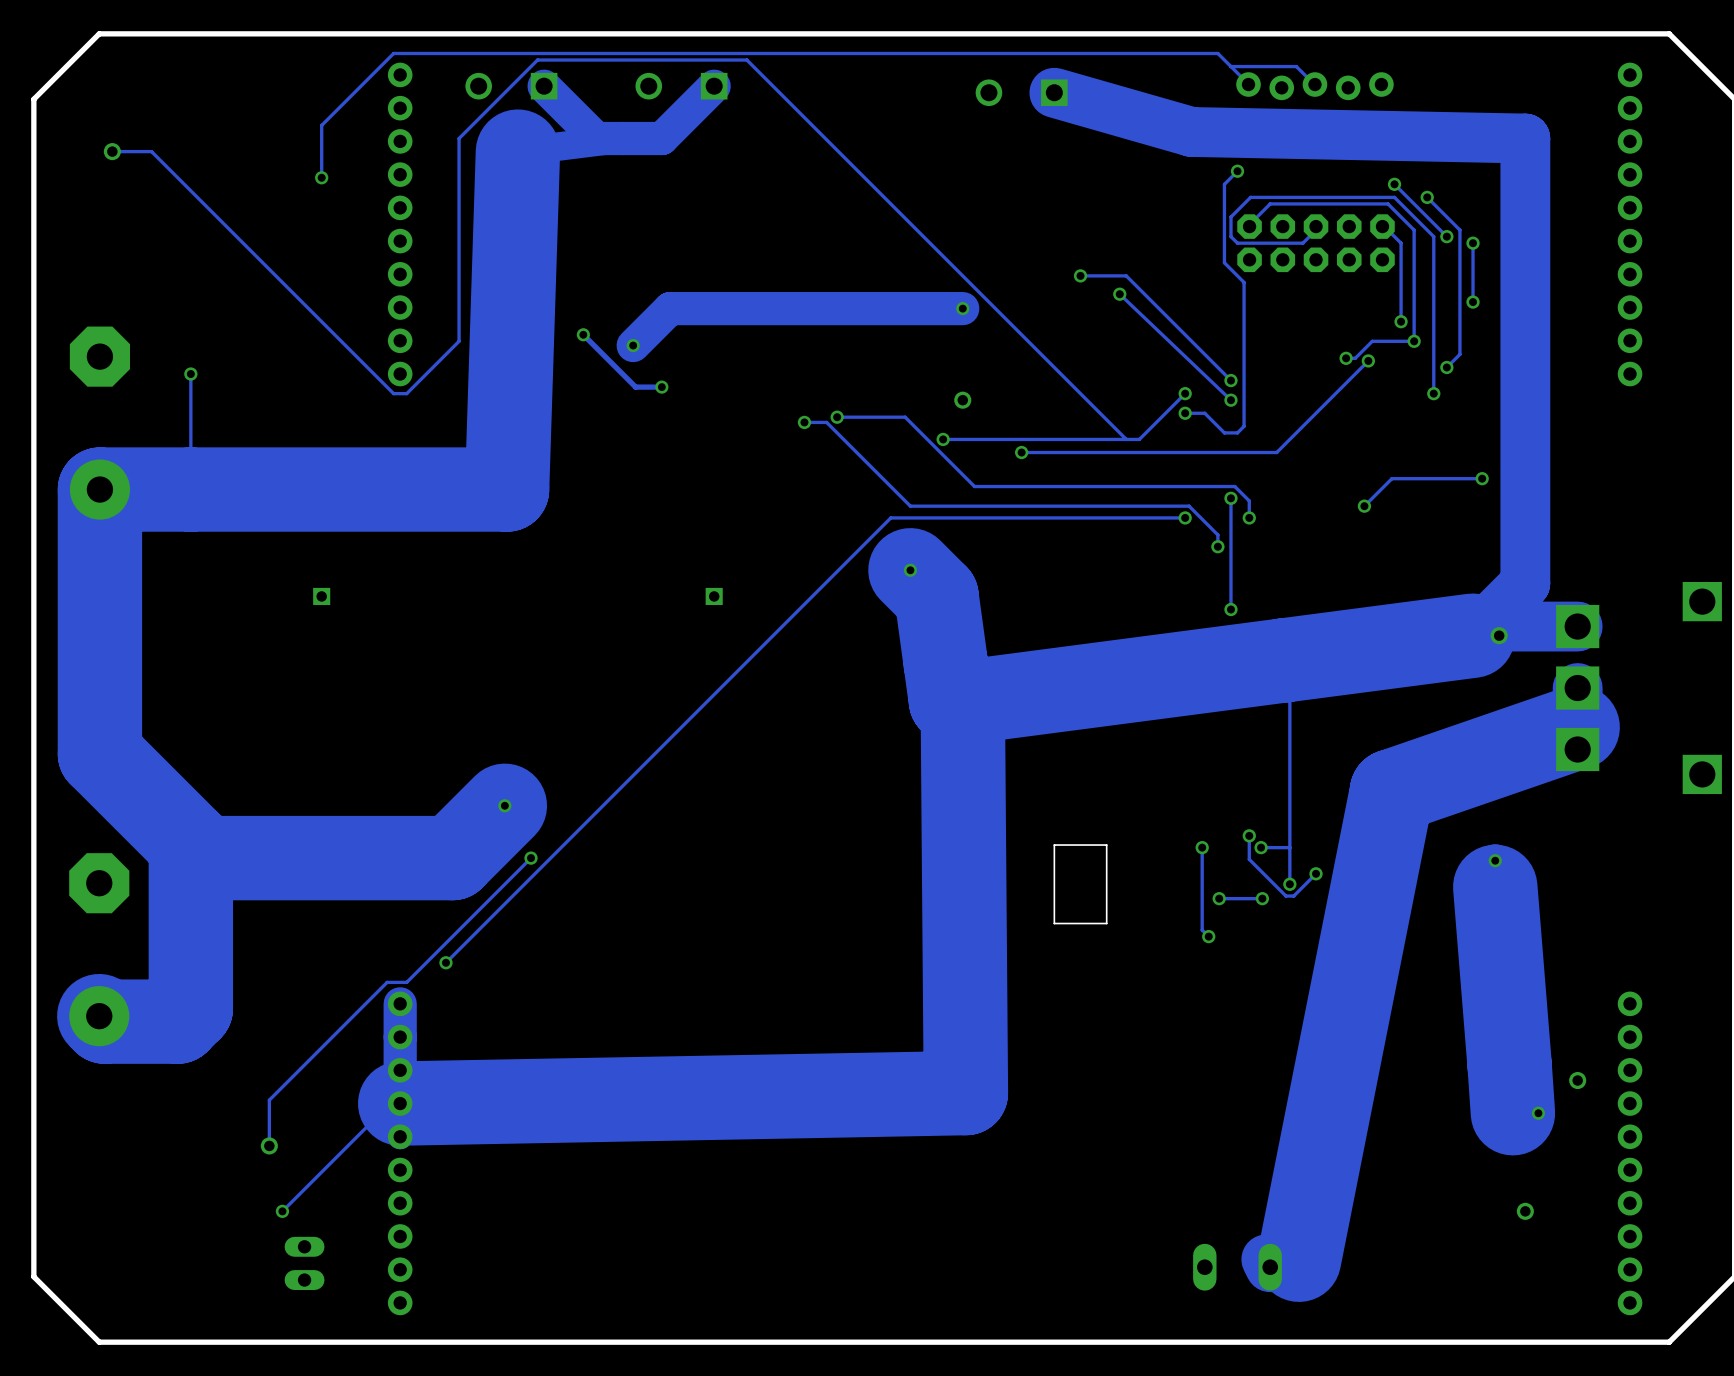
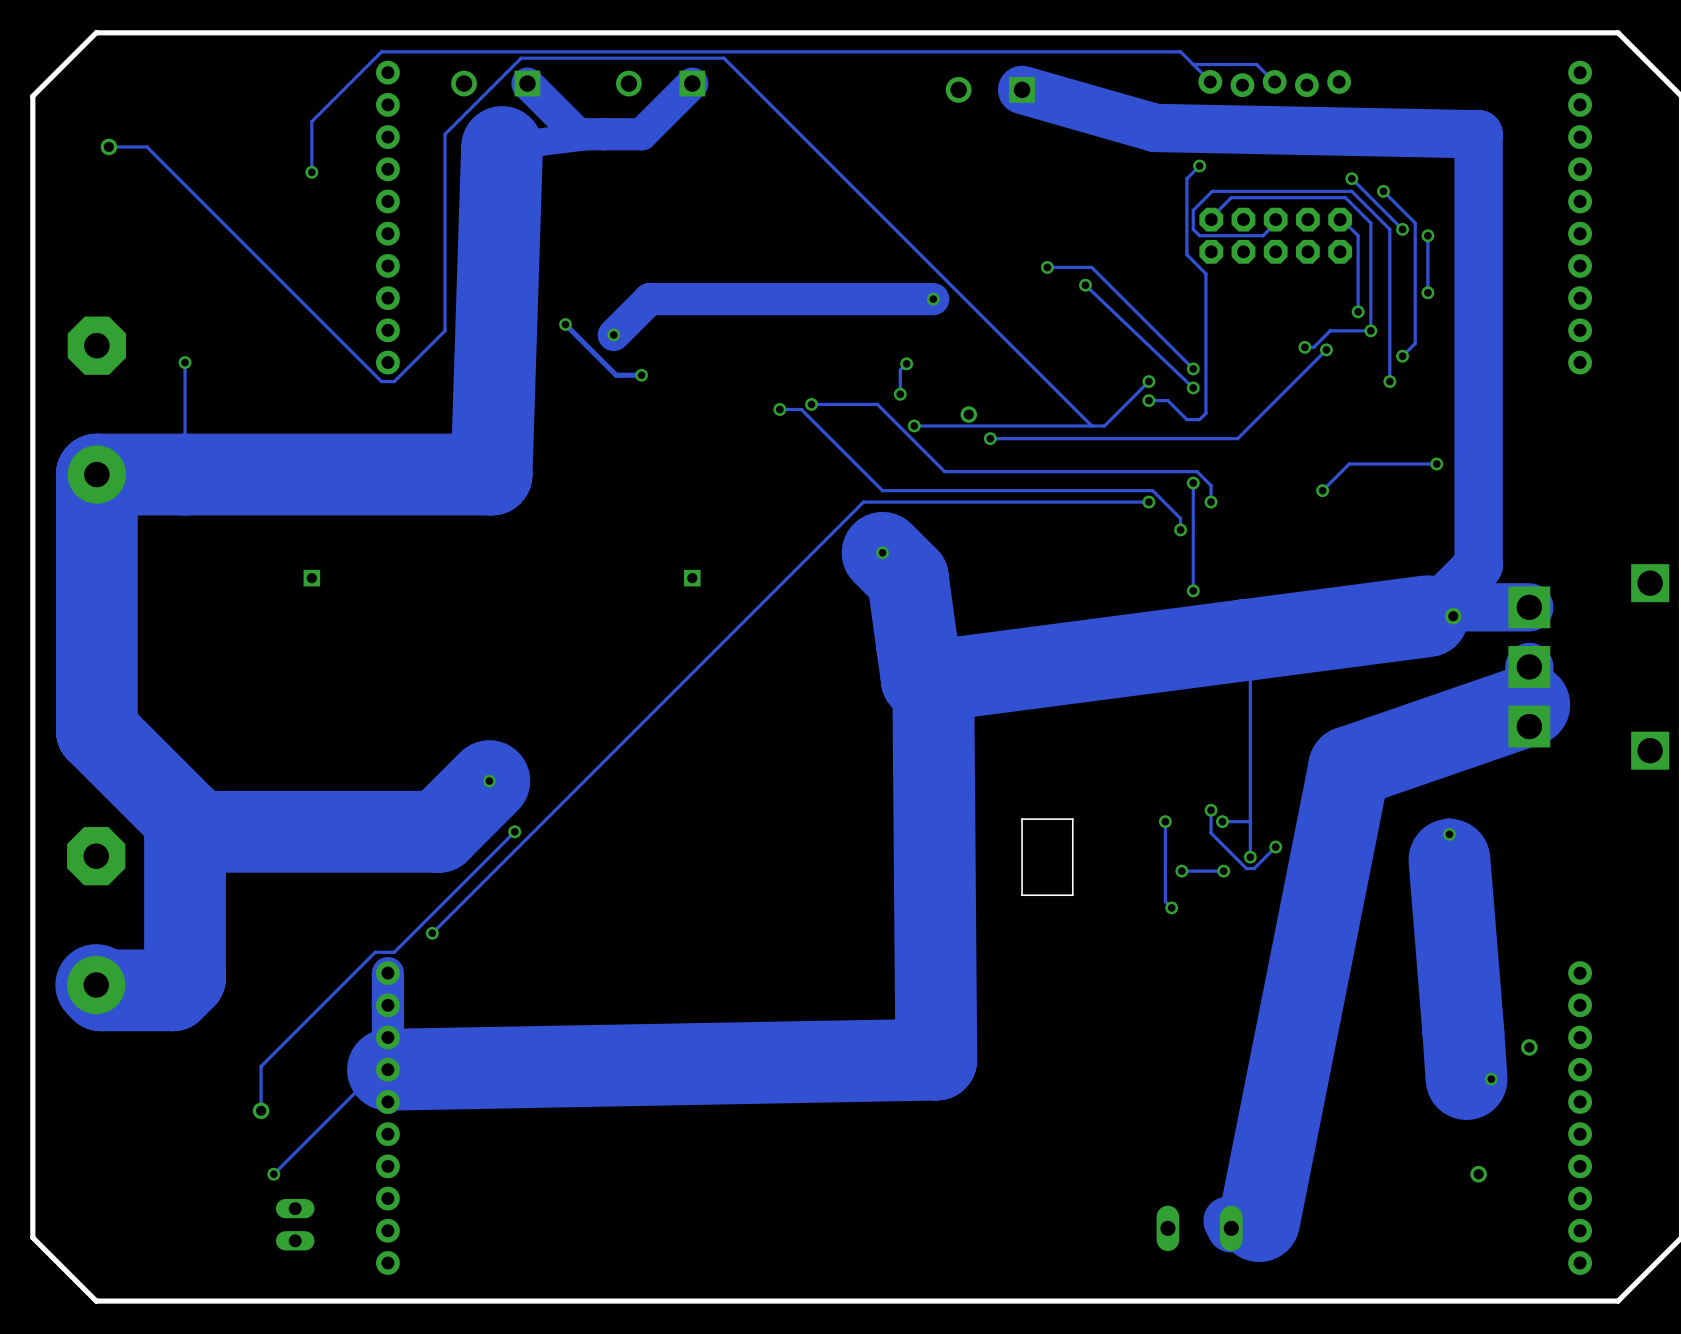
track: none -> (906, 363) (900, 370) (900, 394)
via: none -> (906, 363)
part position: (962, 400) -> (968, 414)
via: none -> (900, 394)

